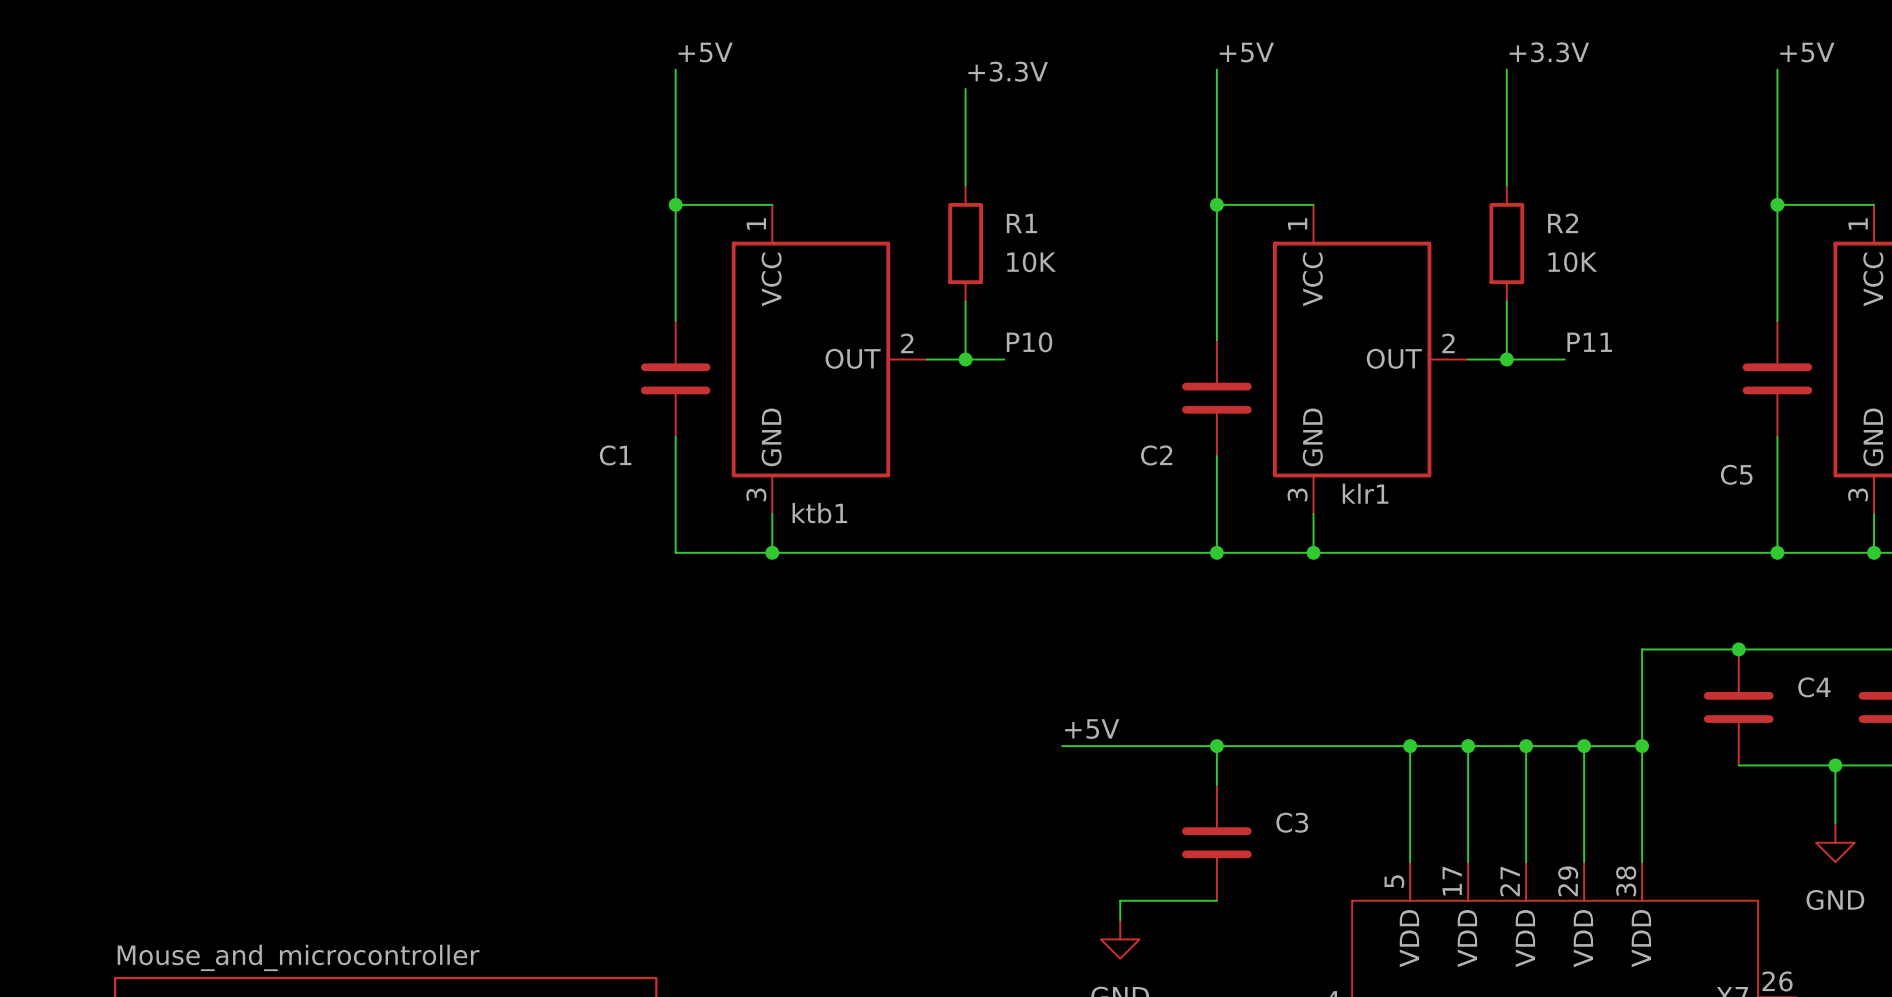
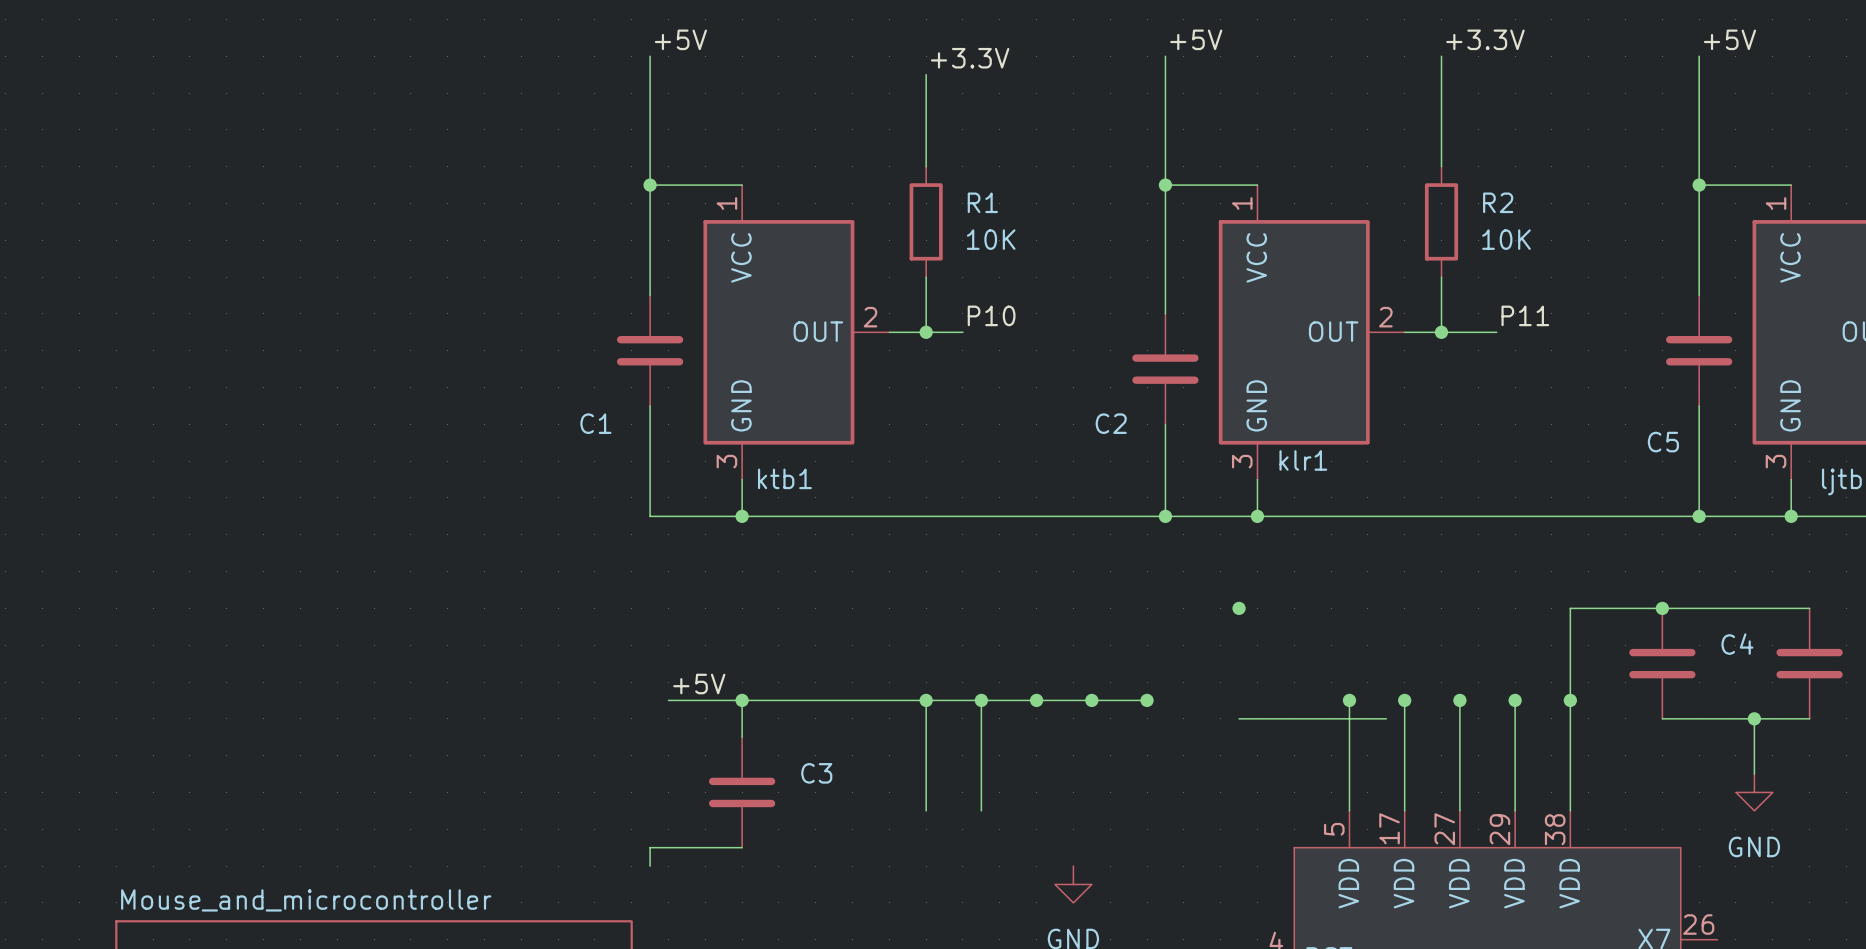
junction: none -> (1239, 608)
label position: +5V (1092, 729) -> +5V (699, 684)
wire: none -> (668, 700) (1018, 700)
wire: none -> (742, 700) (742, 737)
junction: none -> (742, 700)
wire: none -> (926, 700) (926, 810)
junction: none -> (926, 700)
wire: none -> (981, 700) (981, 810)
junction: none -> (981, 700)
junction: none -> (1036, 700)
junction: none -> (1091, 700)
wire: (1197, 746) (1642, 746) -> none
wire: (1216, 746) (1216, 784) -> none
junction position: (1216, 746) -> (1147, 700)
wire: none -> (1239, 718) (1386, 718)
C3 position: (1216, 842) -> (742, 792)
wire: none -> (742, 847) (650, 847) (650, 866)
wire: (1216, 900) (1120, 900) (1120, 920) -> none

